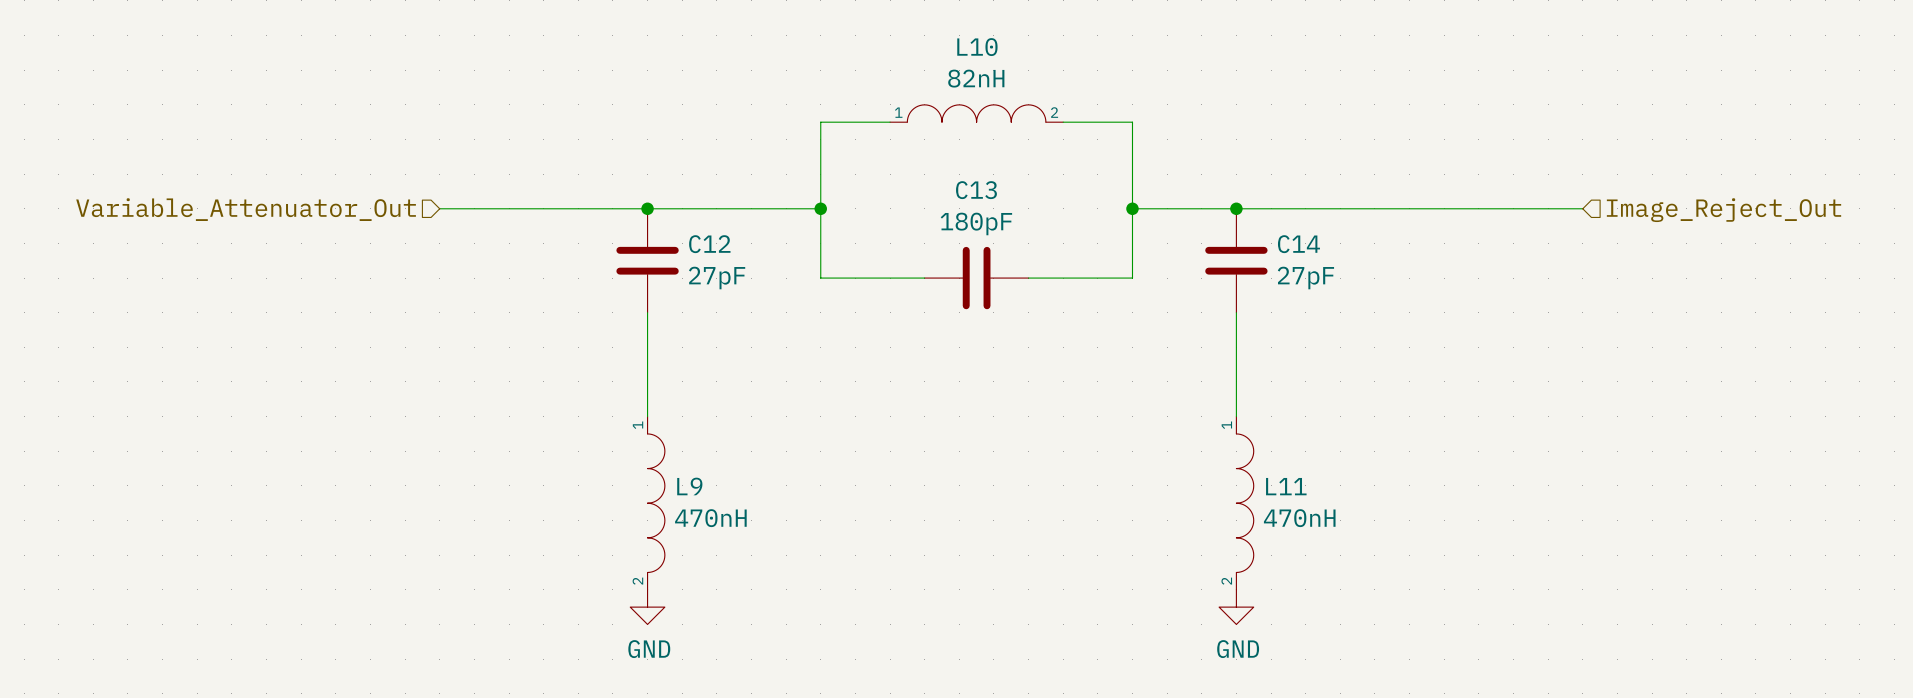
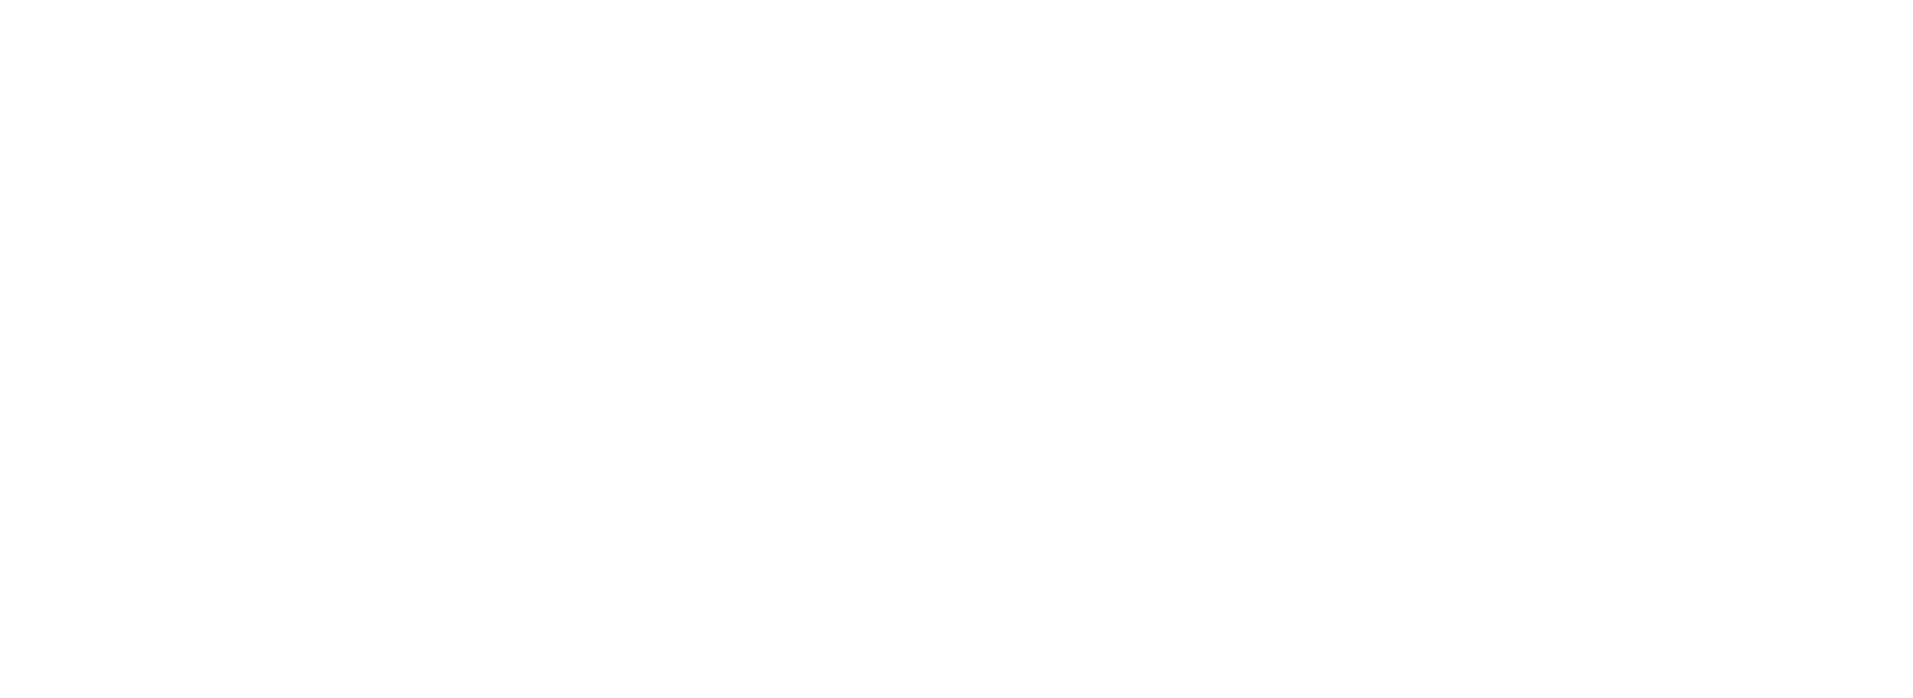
L10: 82nH (976, 113) -> none
wire: (890, 122) (820, 122) (820, 278) (924, 278) -> none
wire: (1063, 122) (1132, 122) (1132, 278) (1028, 278) -> none
wire: (439, 208) (820, 208) -> none
junction: (647, 208) -> none
junction: (820, 208) -> none
wire: (1132, 208) (1582, 208) -> none
junction: (1132, 208) -> none
junction: (1236, 208) -> none
hierarchical label: Variable_Attenuator_Out (246, 209) -> none
hierarchical label: Image_Reject_Out (1724, 210) -> none
C12: 27pF (647, 260) -> none
C14: 27pF (1236, 260) -> none
C13: 180pF (976, 278) -> none
wire: (647, 312) (647, 416) -> none
wire: (1236, 312) (1236, 416) -> none
L9: 470nH (656, 503) -> none
L11: 470nH (1245, 503) -> none
power symbol: GND (647, 607) -> none
power symbol: GND (1236, 607) -> none

